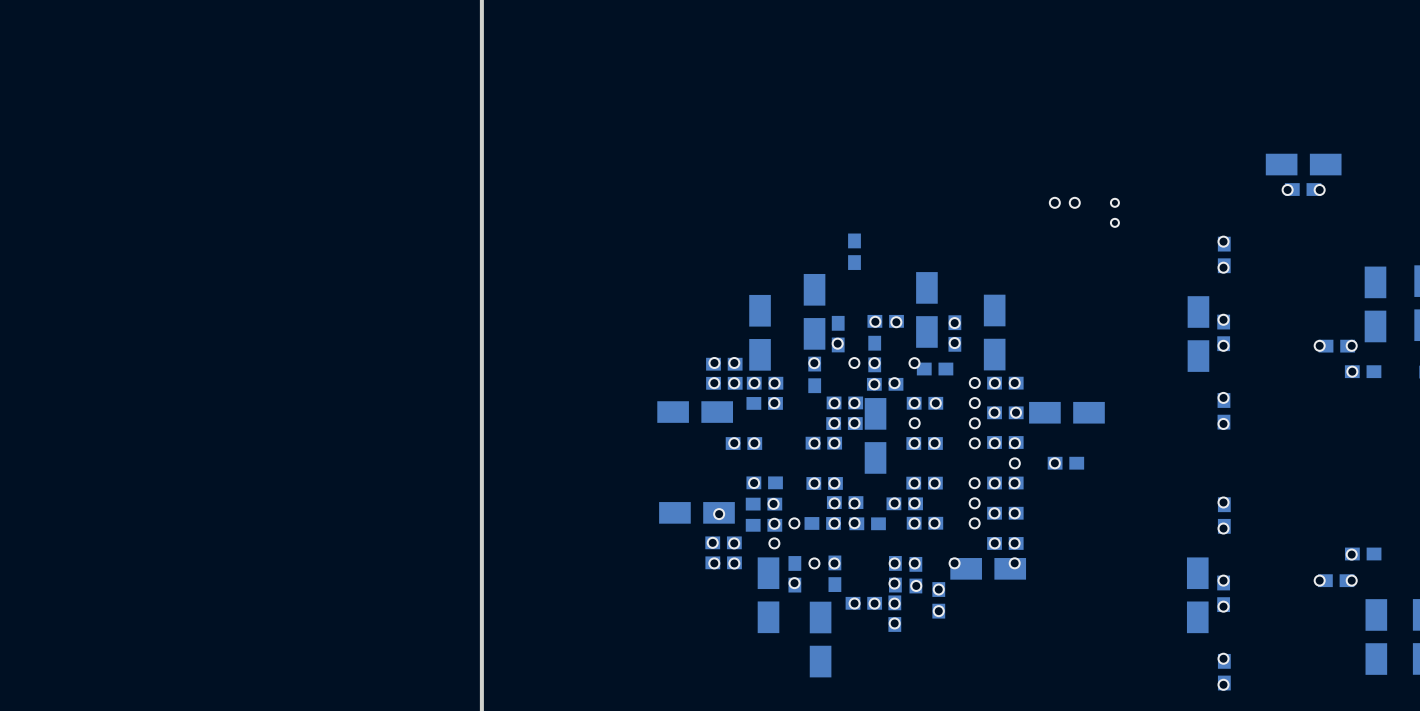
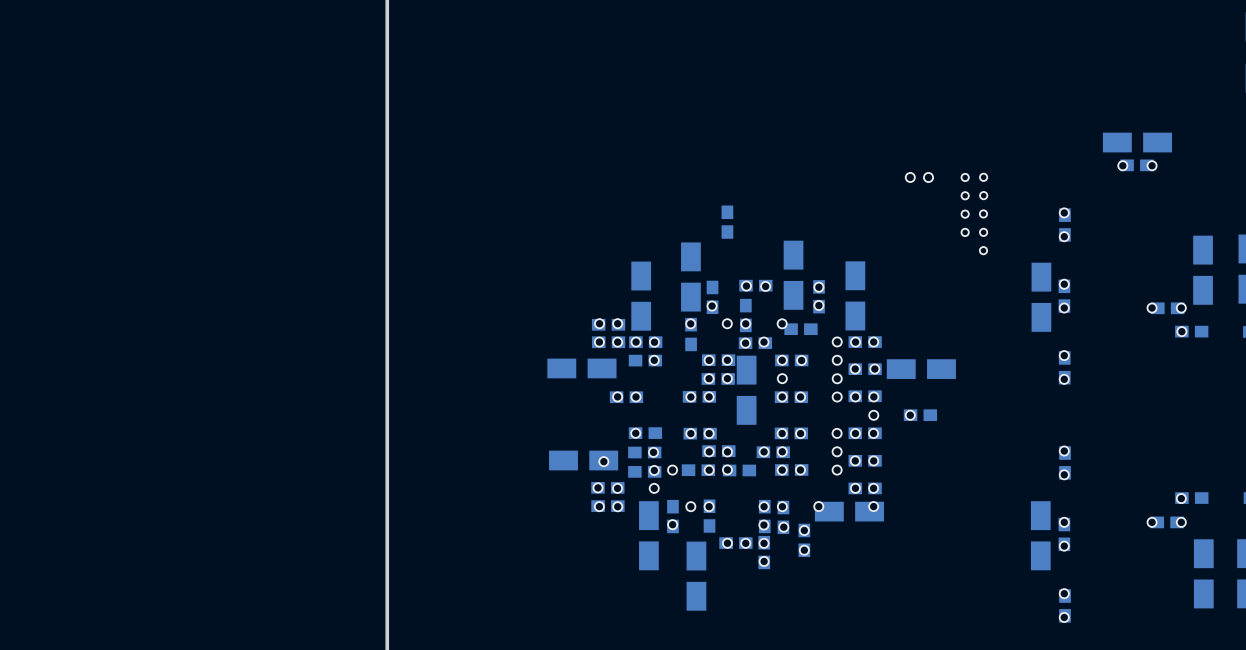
via: none -> (983, 177)
via: none -> (983, 195)
via: none -> (965, 214)
via: none -> (983, 213)
via: none -> (983, 232)
via: none -> (965, 232)
via: none -> (983, 250)

